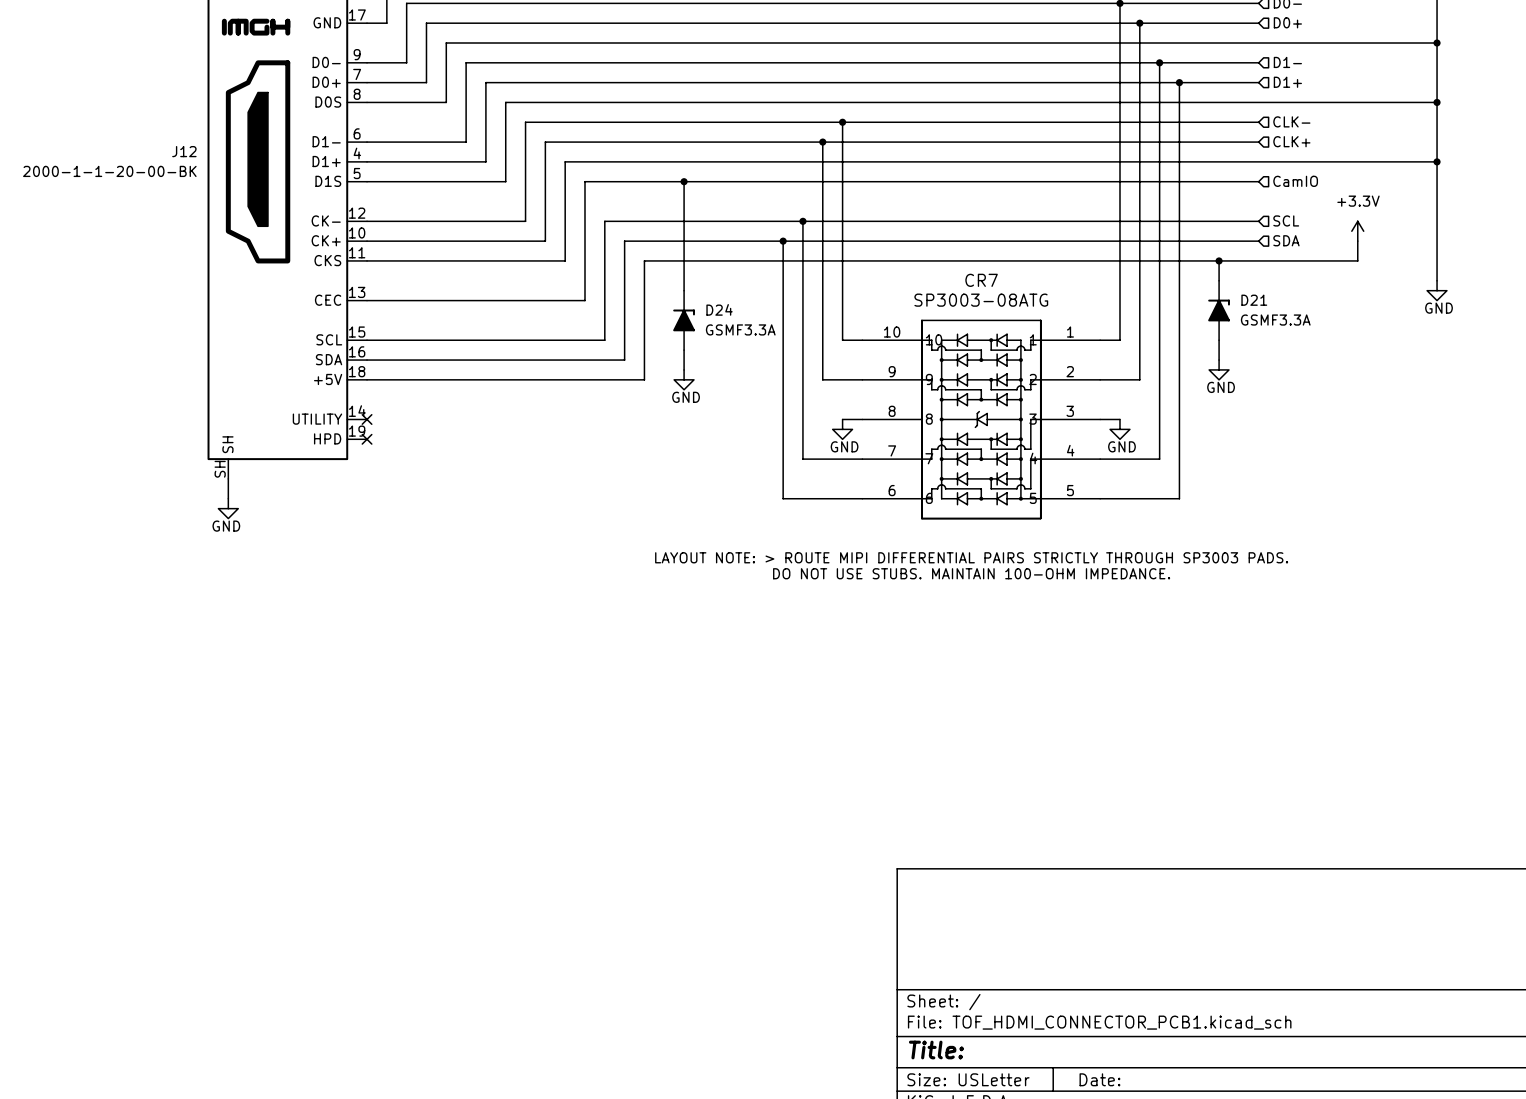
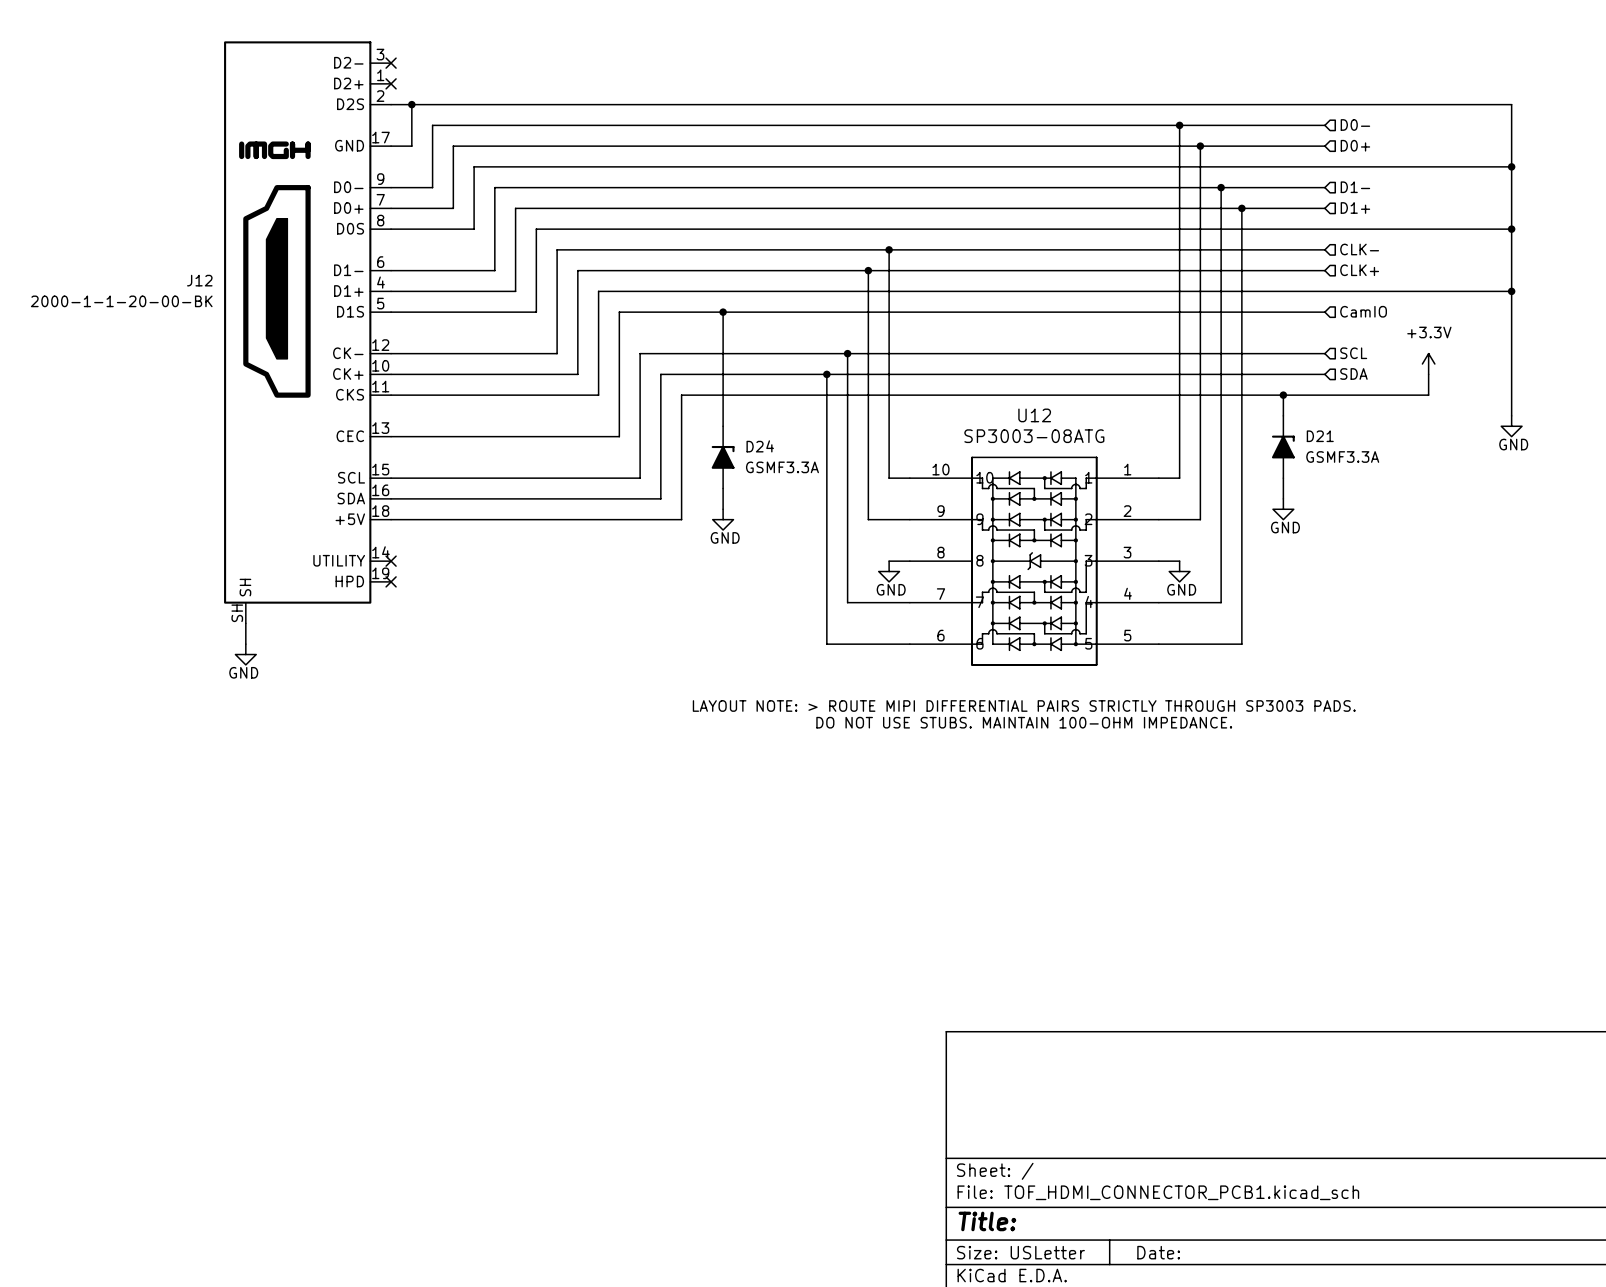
CR7 name: CR7 (981, 280) -> U12 (1034, 415)

